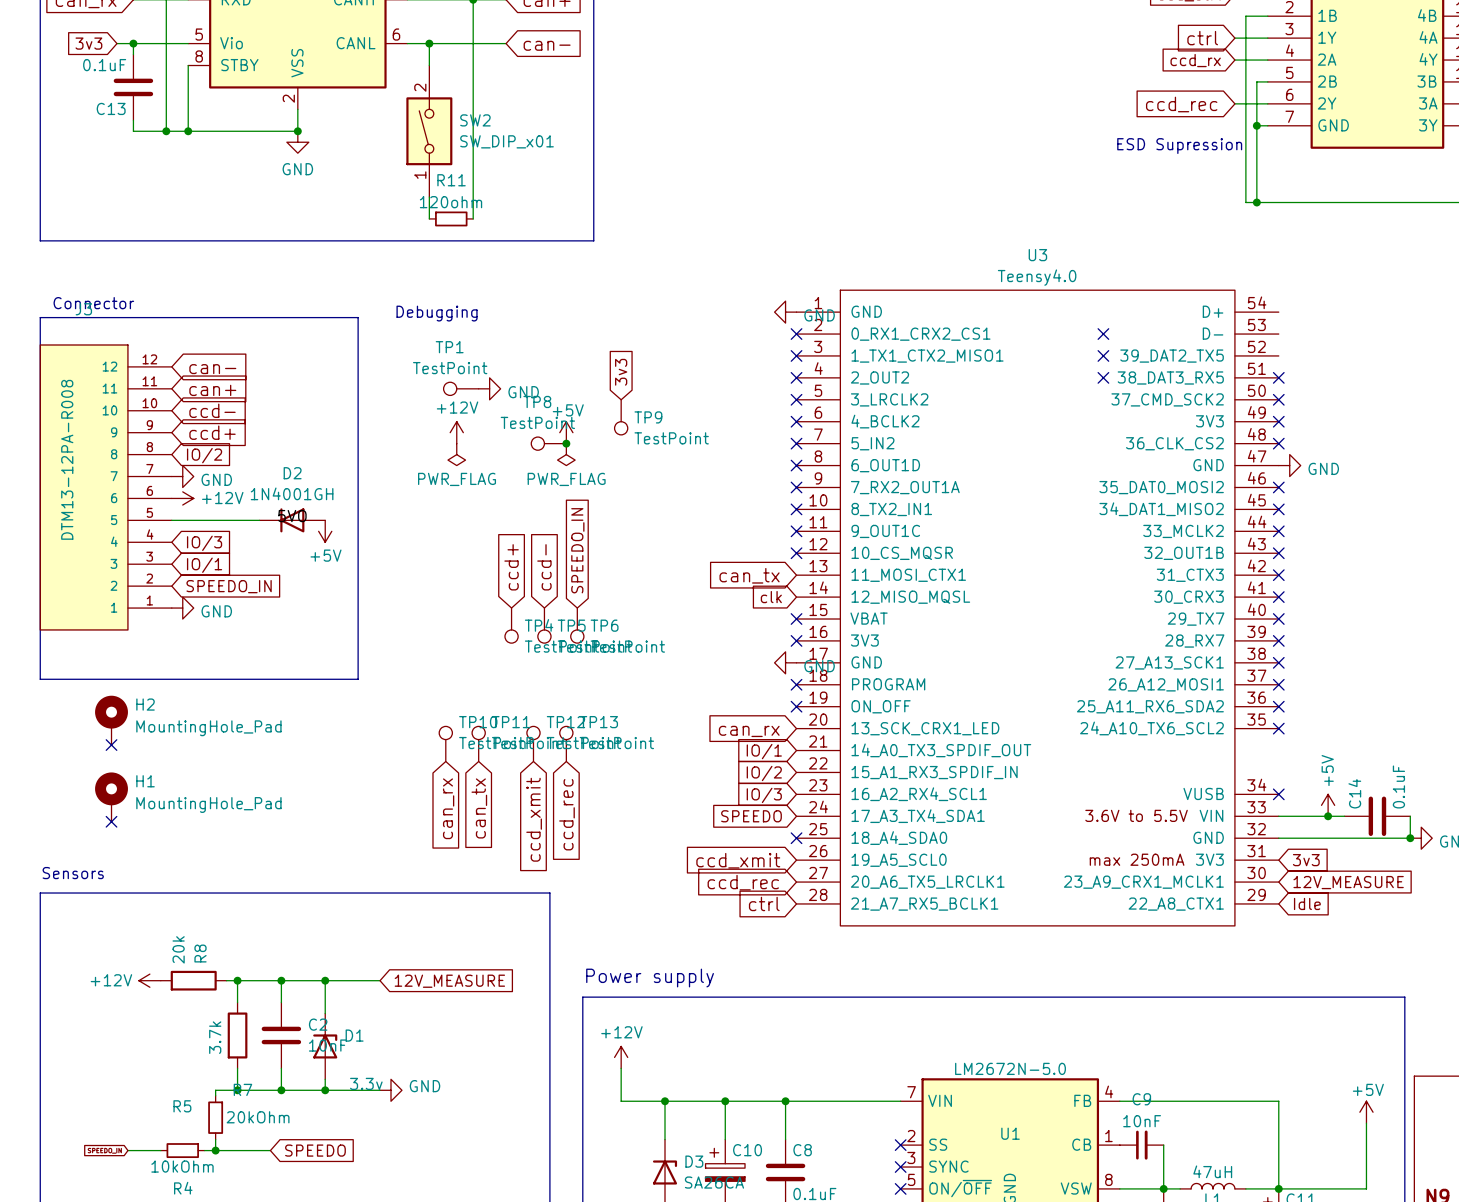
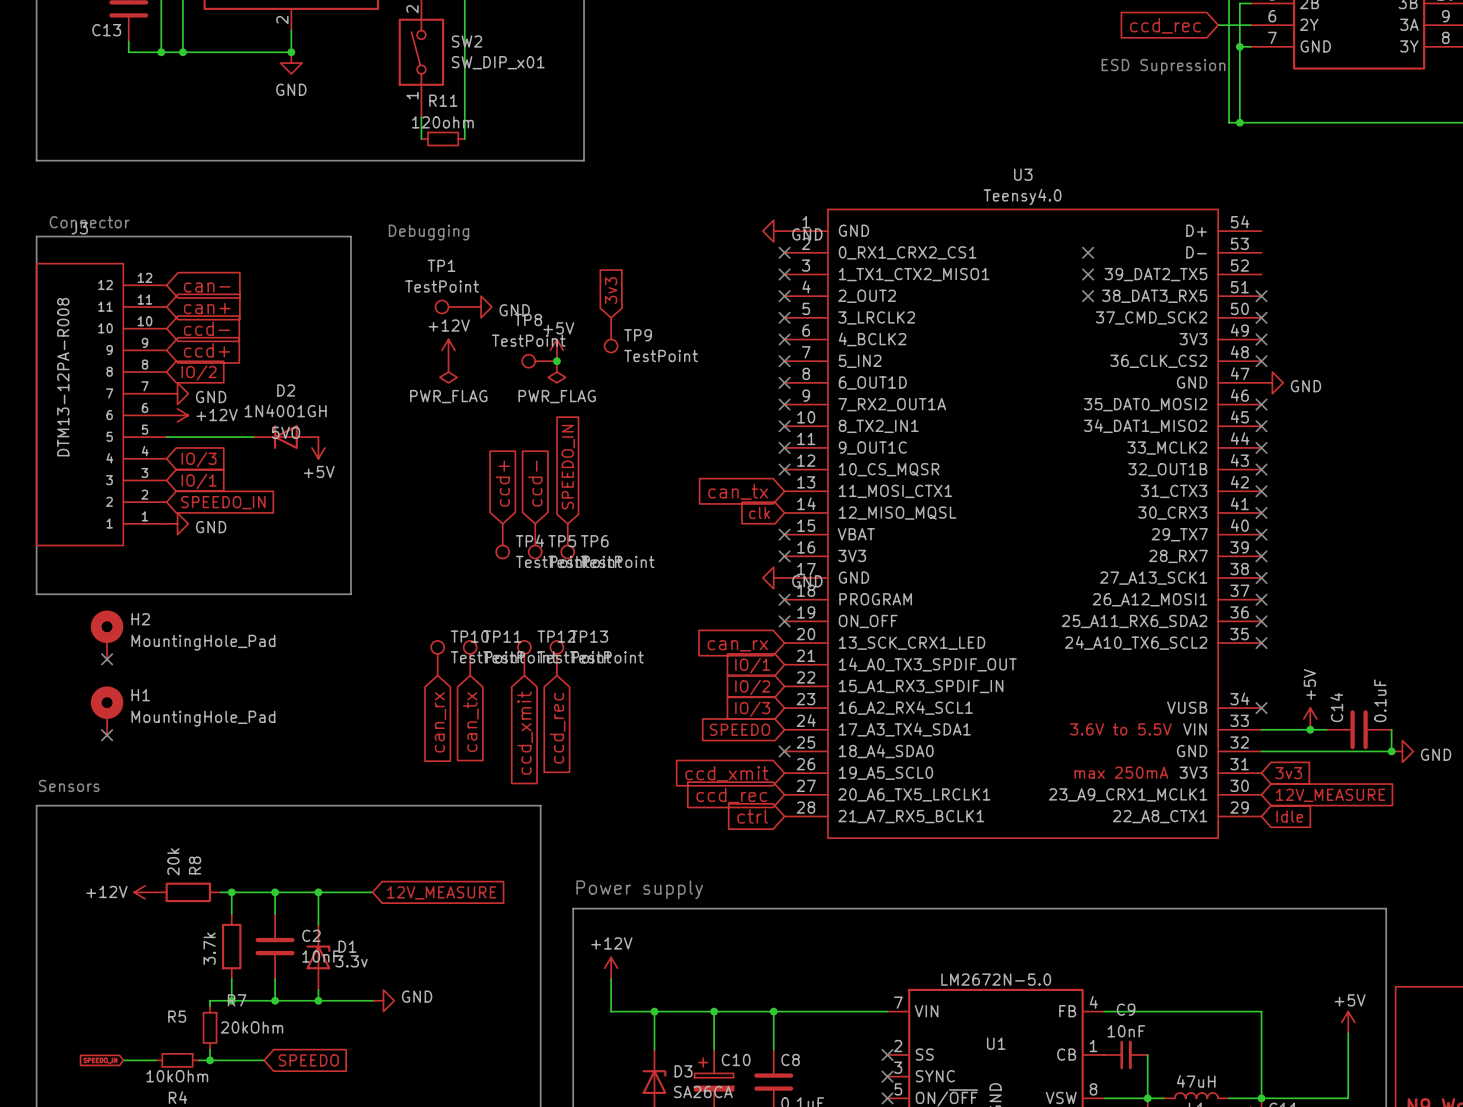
D1 value position: 3.3v (366, 1083) -> 3.3v (351, 961)

